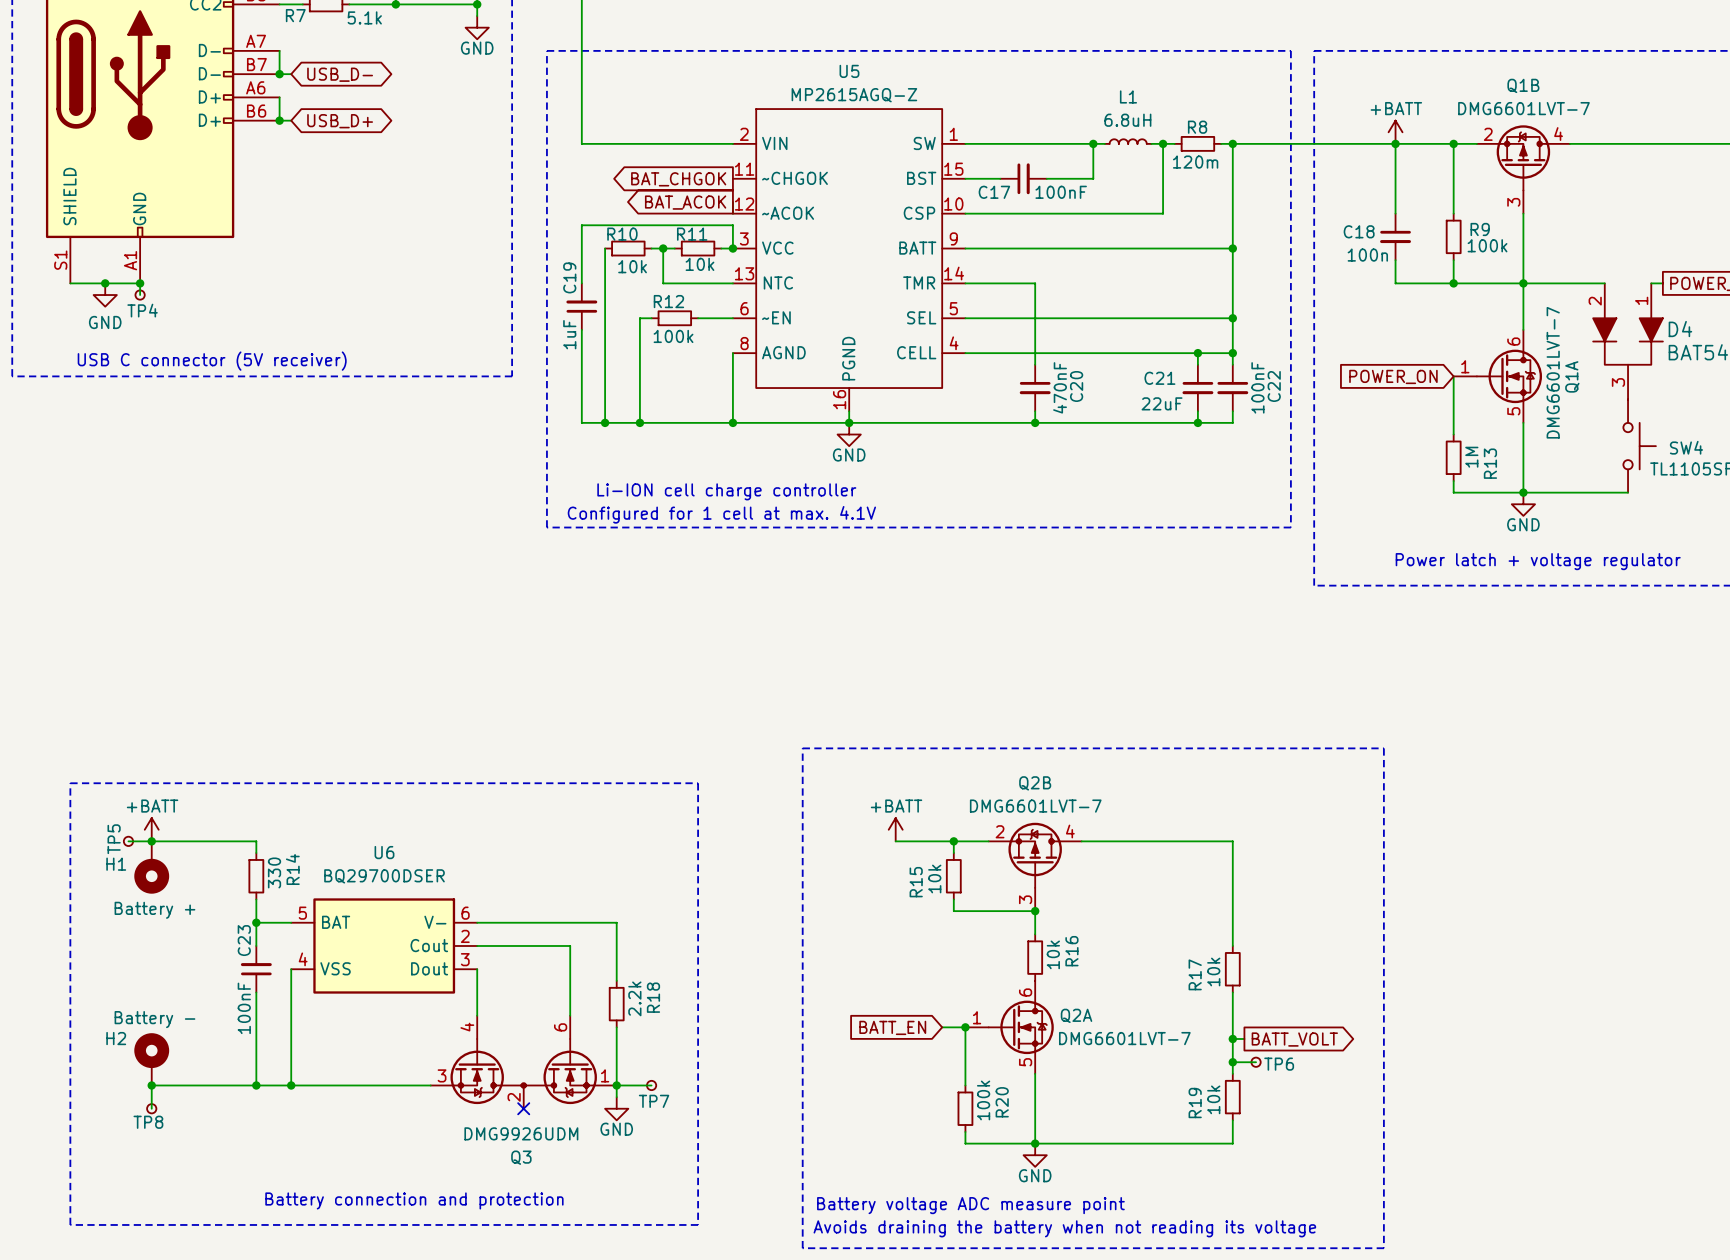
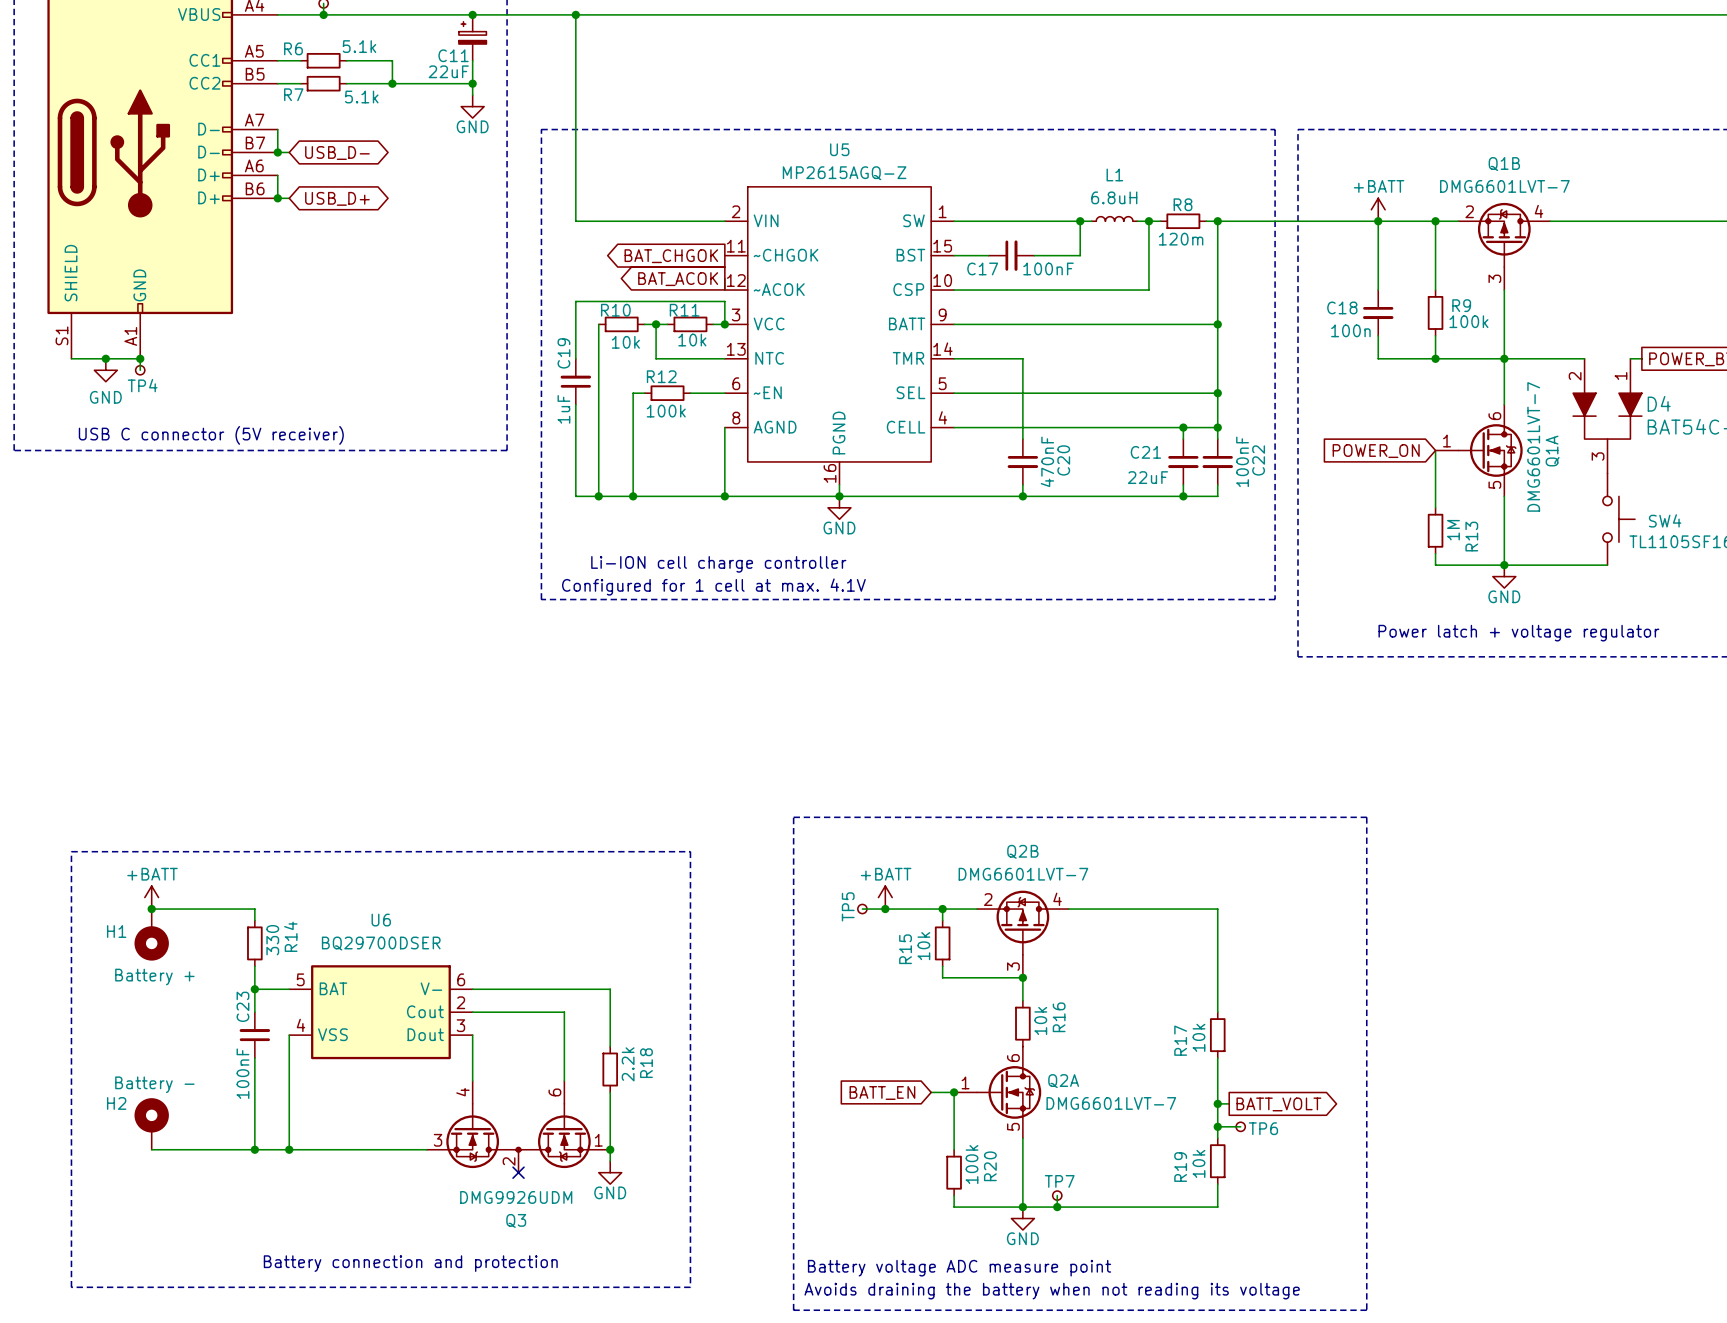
wire: (128, 841) (151, 841) -> none
TP5 position: (128, 841) -> (862, 909)
wire: none -> (862, 909) (885, 909)
junction: none -> (885, 909)
wire: (151, 1085) (151, 1108) -> none
junction: (151, 1085) -> none
wire: (616, 1085) (651, 1085) -> none
TP7 position: (651, 1085) -> (1057, 1195)
TP7 name position: TP7 (654, 1101) -> TP7 (1059, 1181)
TP8: (151, 1108) -> none
wire: none -> (1057, 1195) (1057, 1207)
junction: none -> (1057, 1207)

